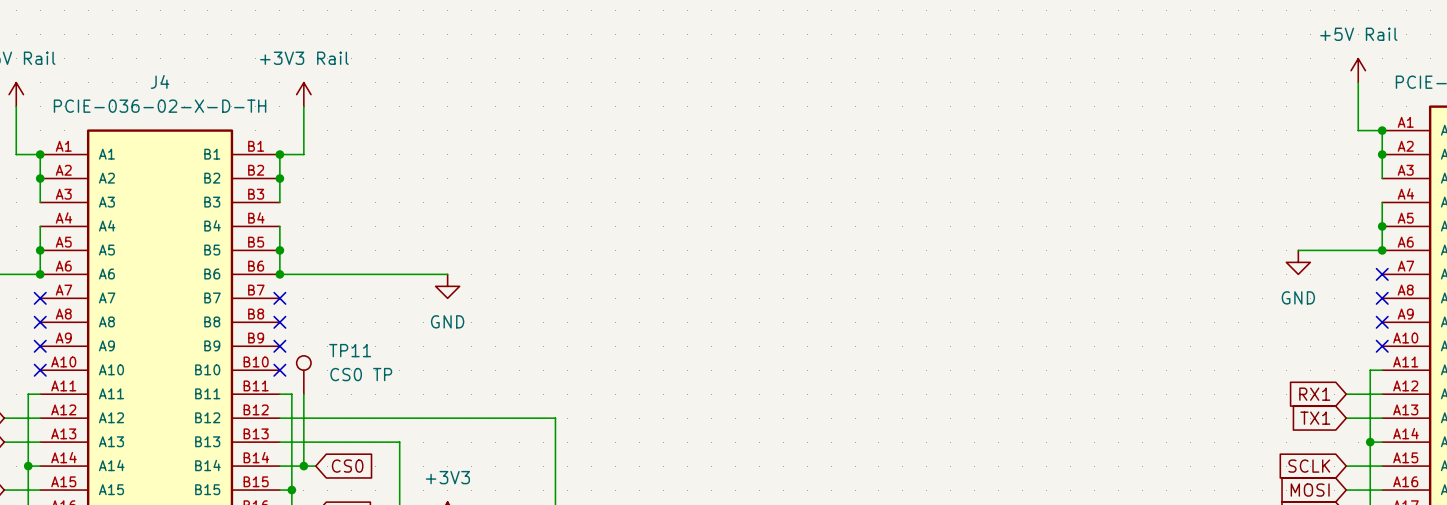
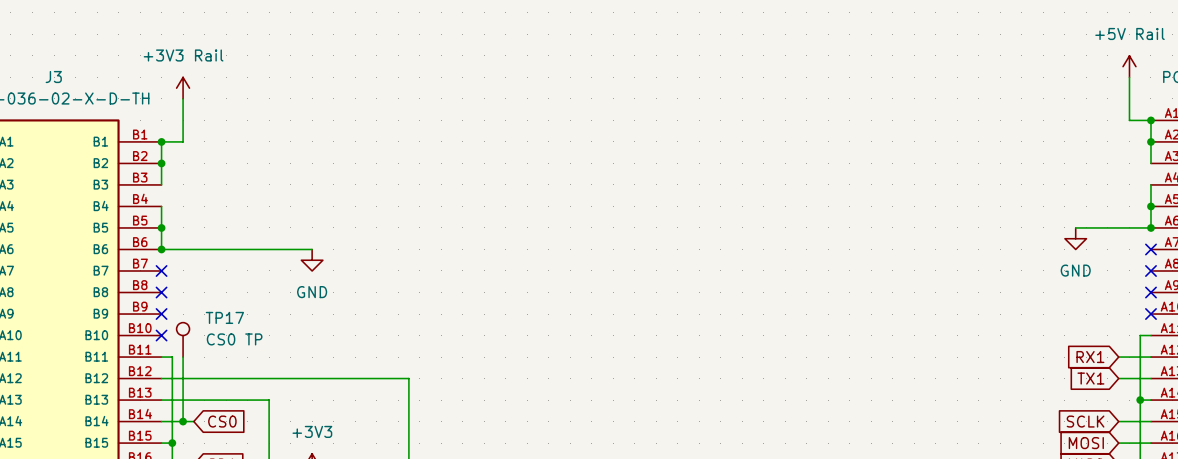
J4 name: J4 (160, 81) -> J3 (53, 77)
TP11 name: TP11 (350, 350) -> TP17 (224, 317)

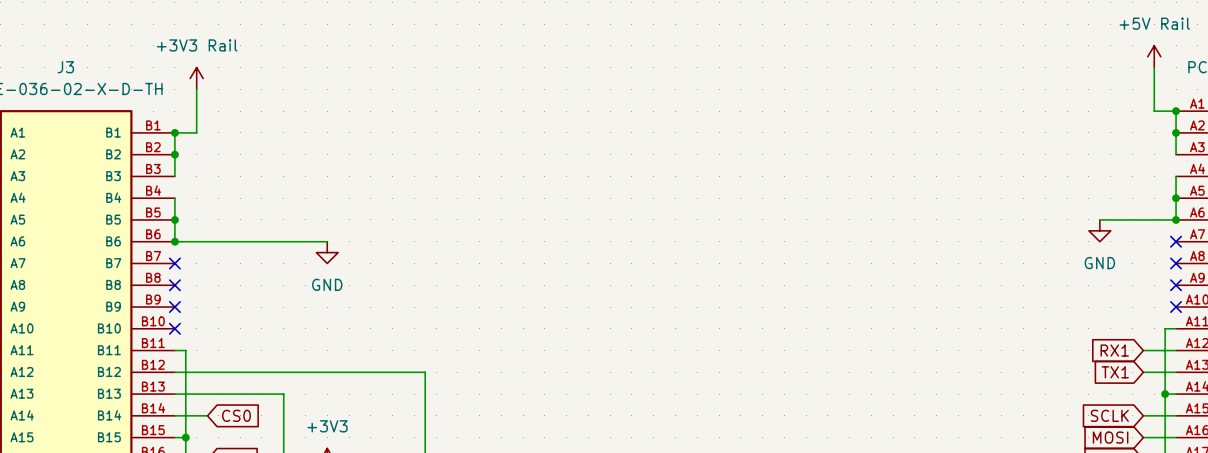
TP17: CS0 TP (183, 339) -> none
wire: (183, 357) (183, 421) -> none
junction: (183, 421) -> none

